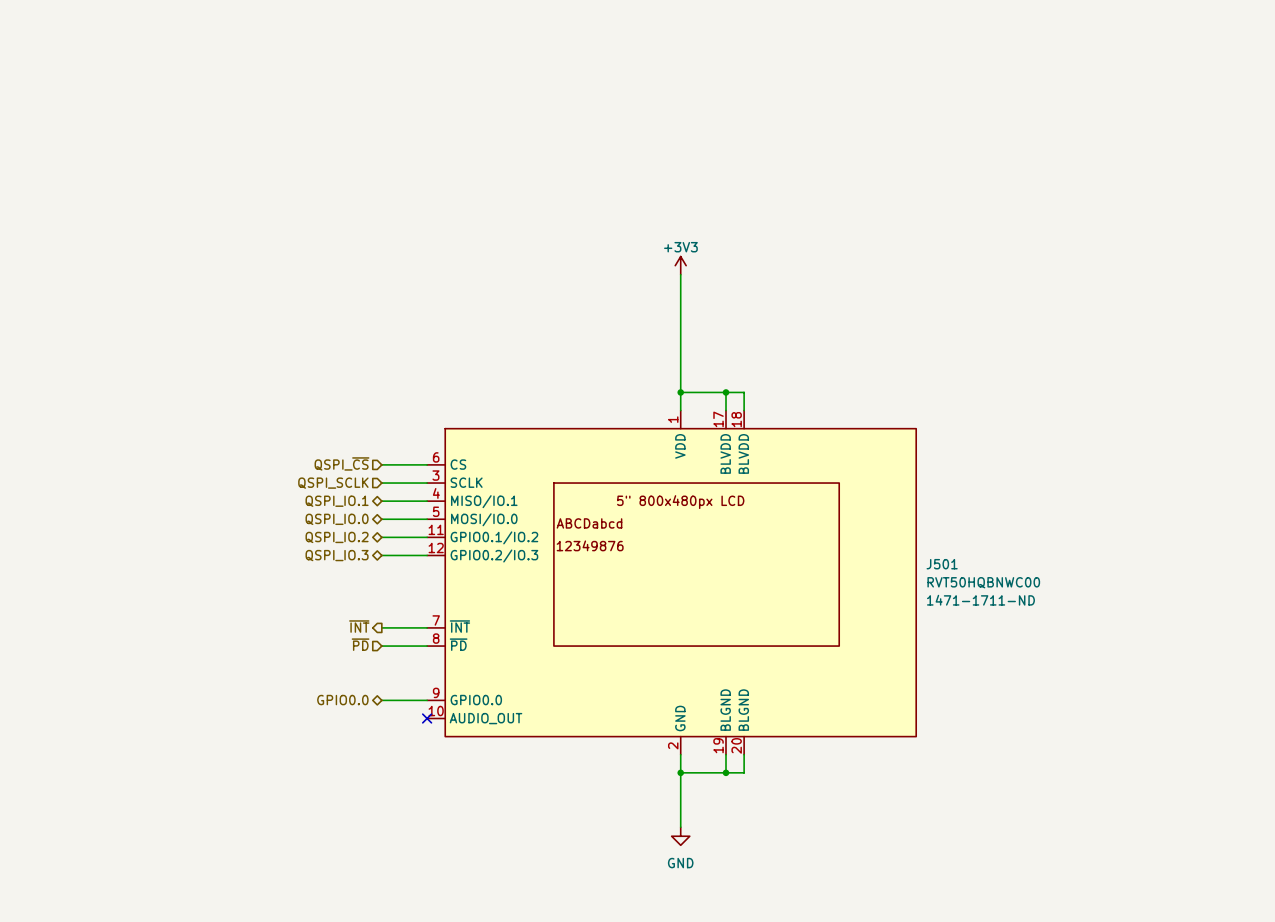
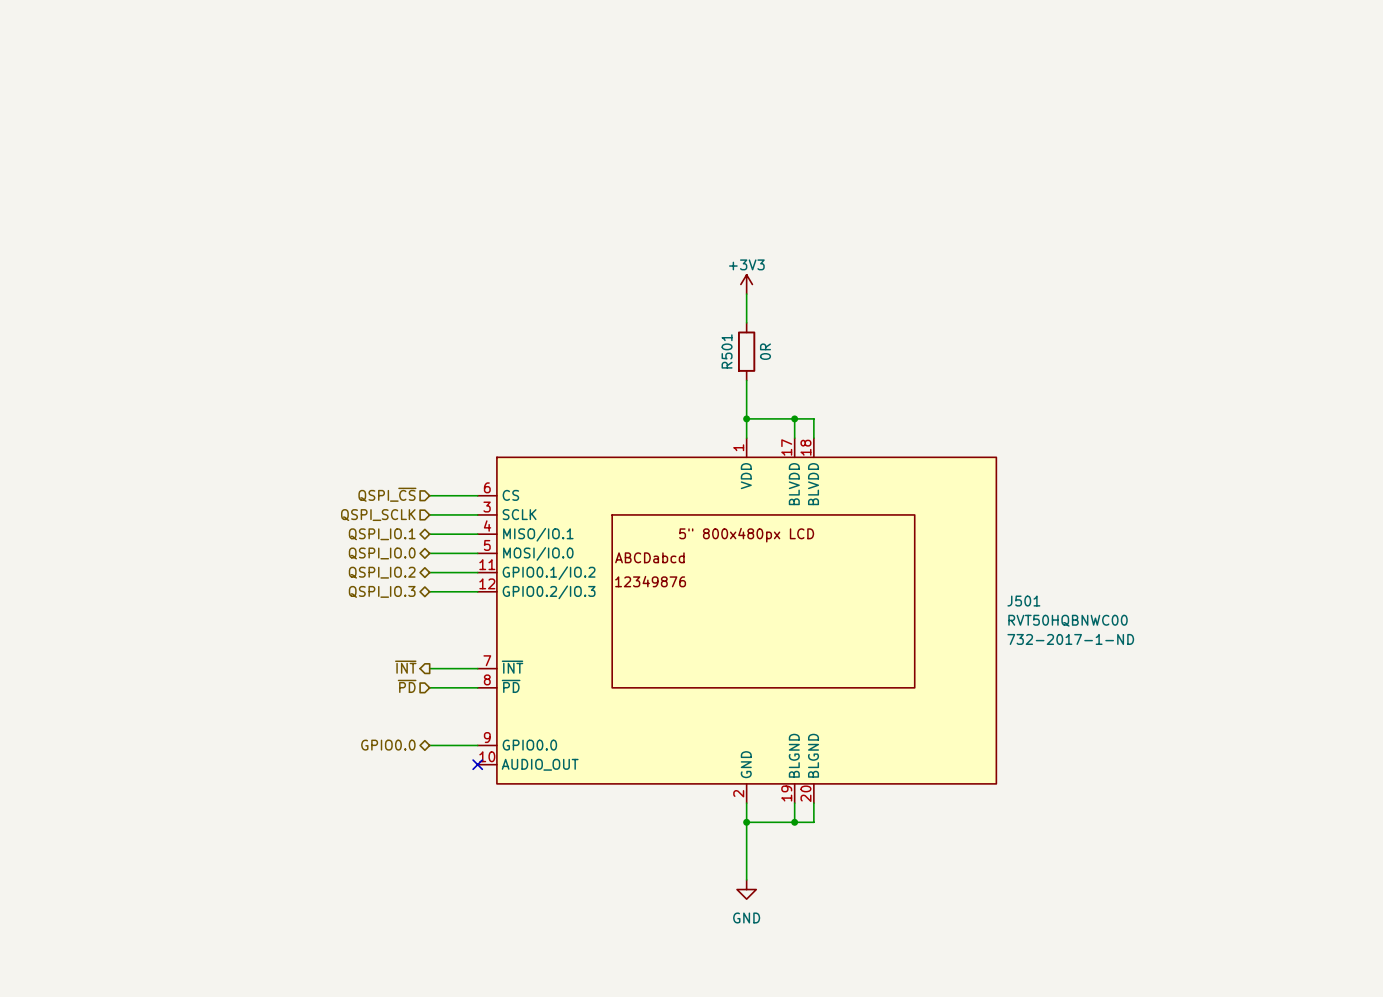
wire: (680, 301) (680, 356) -> none
R501: none -> 0R (746, 351)
J501 text: 1471-1711-ND (980, 600) -> 732-2017-1-ND (1070, 639)

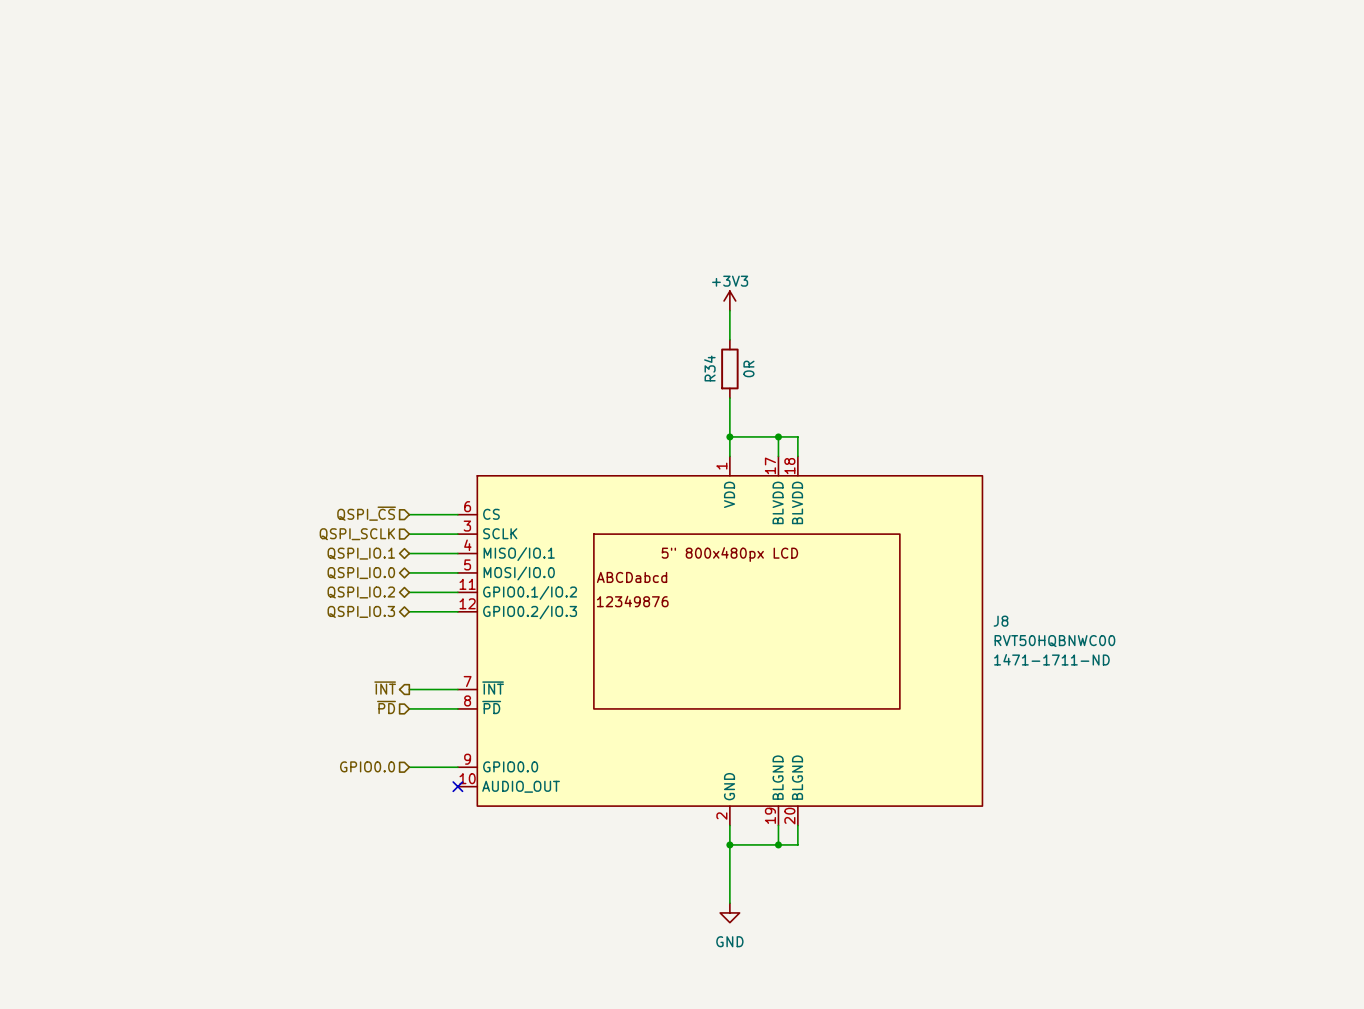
R501 name: R501 (727, 351) -> R34 (709, 368)
J501 name: J501 (1023, 601) -> J8 (1001, 621)
J501 text: 732-2017-1-ND (1070, 639) -> 1471-1711-ND (1051, 659)
hierarchical label shape: bidirectional (388, 745) -> input (367, 766)

